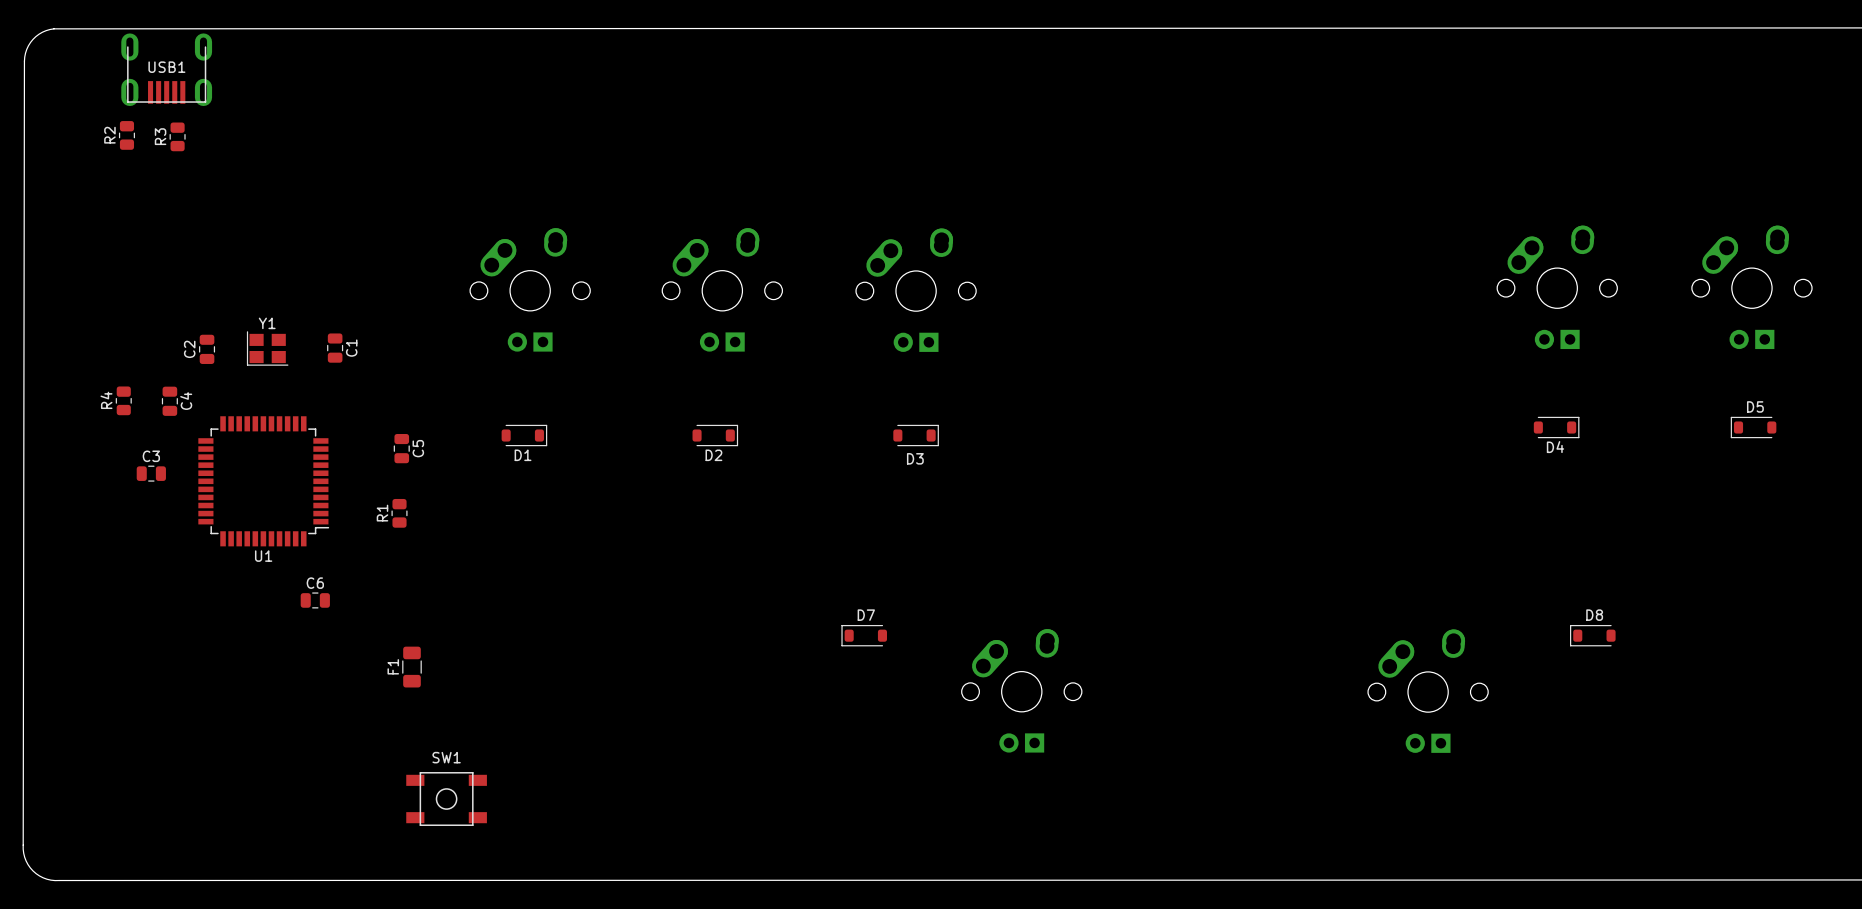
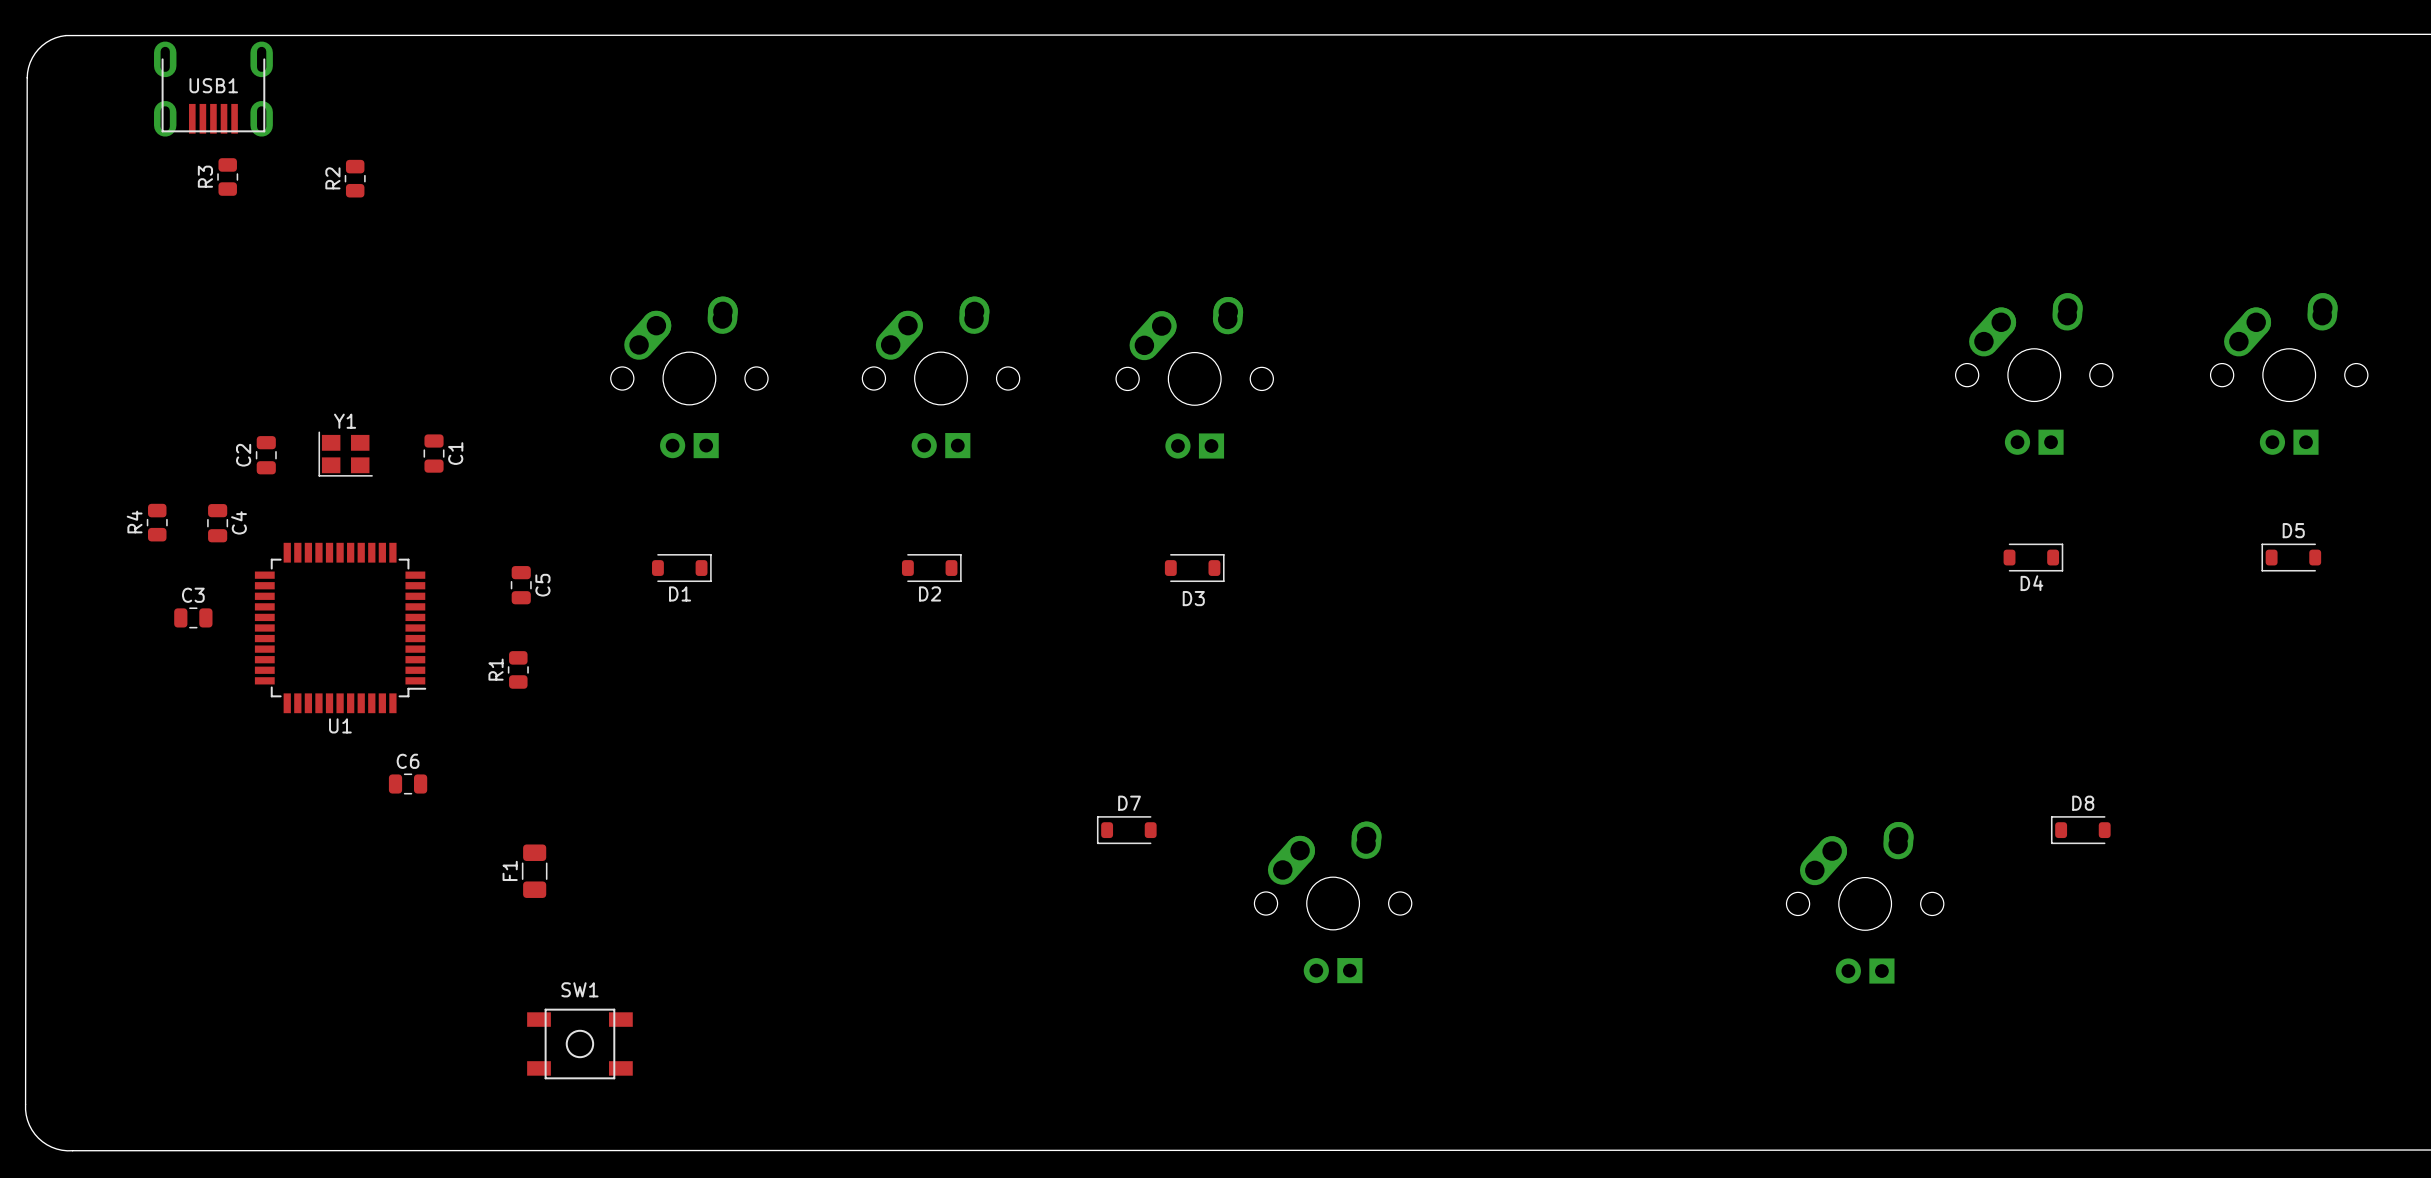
R2 position: (126, 135) -> (355, 178)

